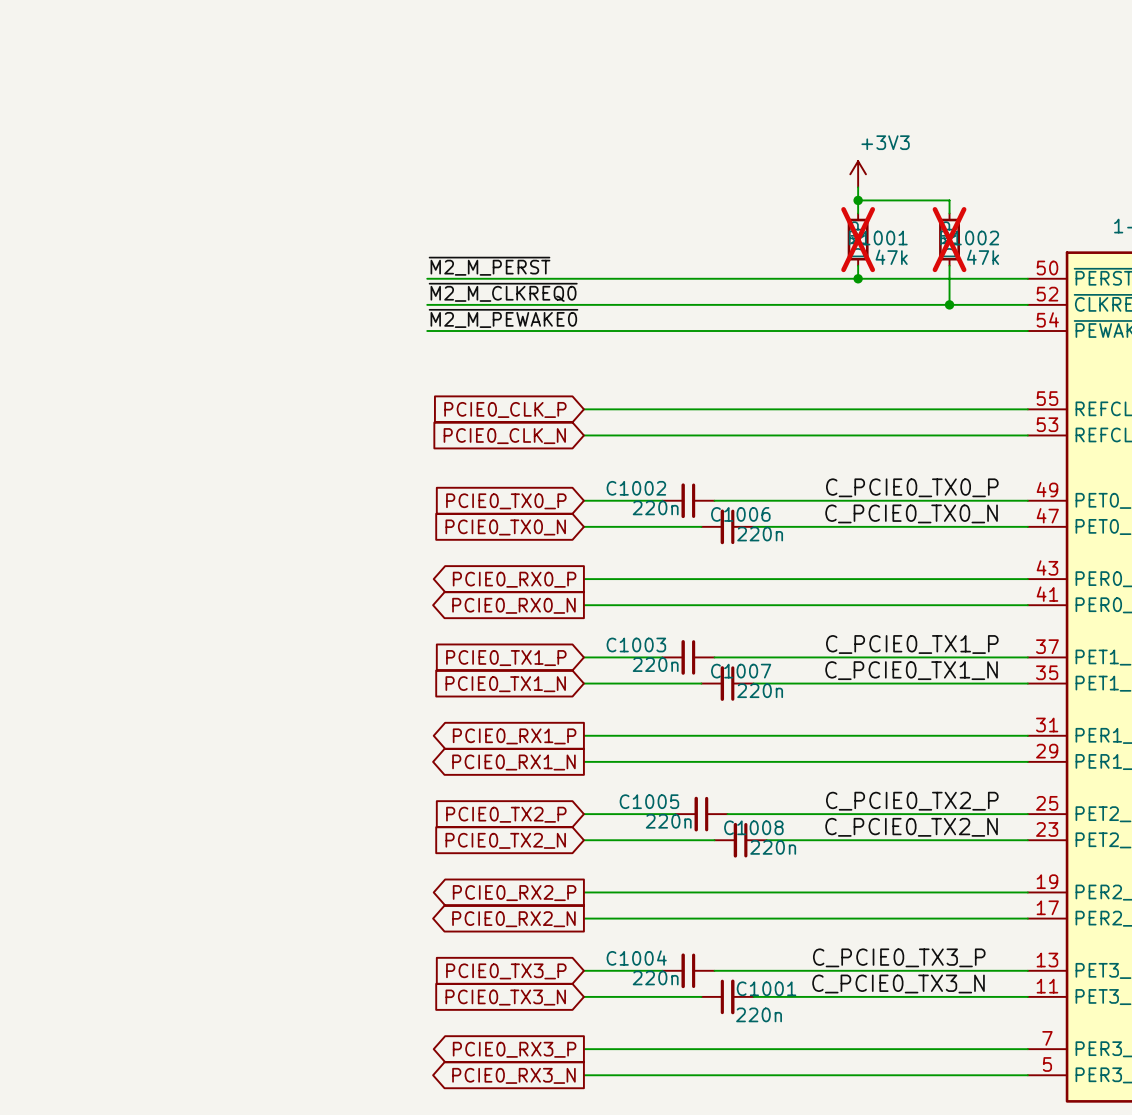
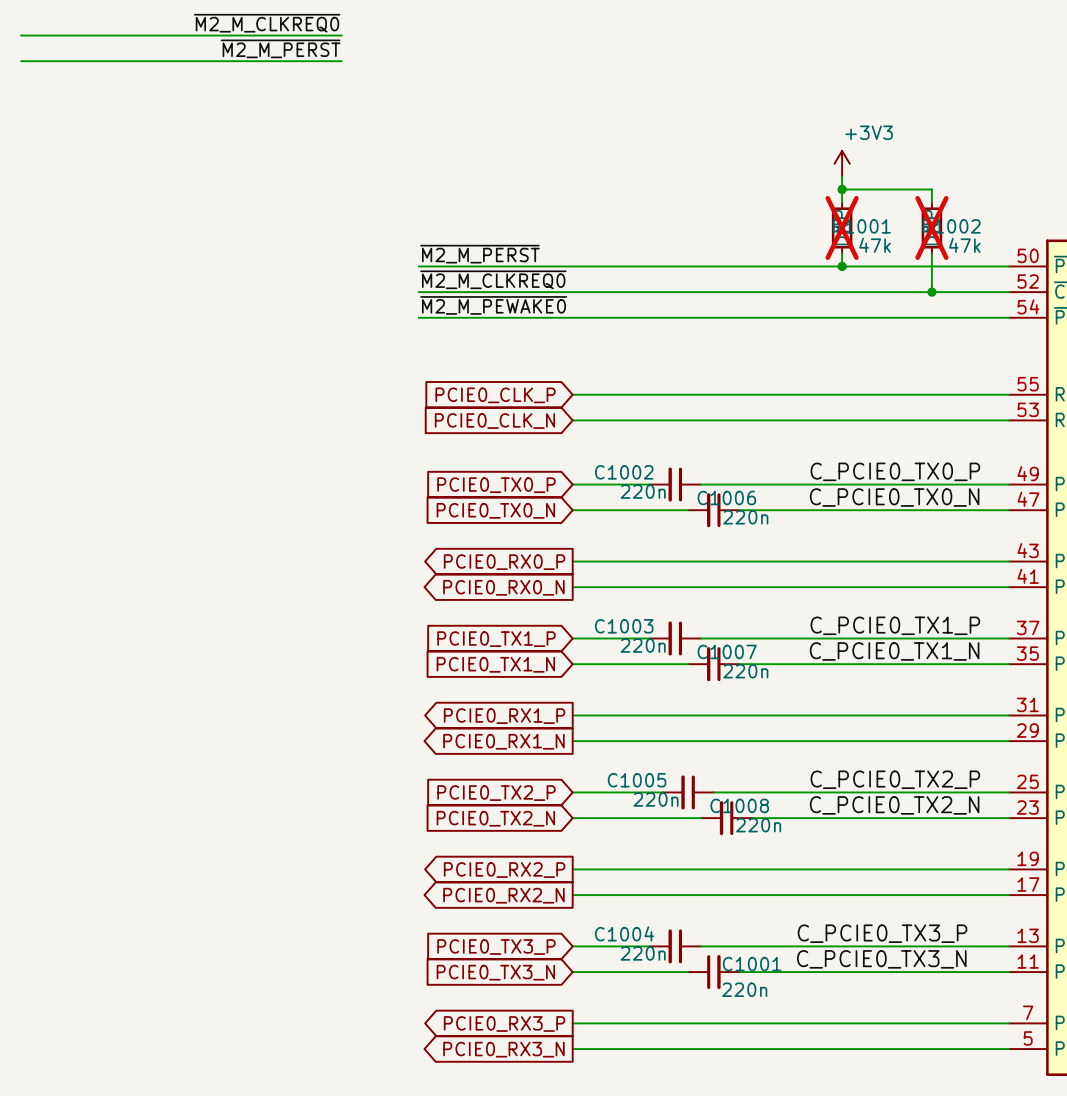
label: none -> ~{M2_M_CLKREQ0} (267, 23)
wire: none -> (21, 35) (341, 35)
label: none -> ~{M2_M_PERST} (280, 48)
wire: none -> (21, 61) (341, 61)

